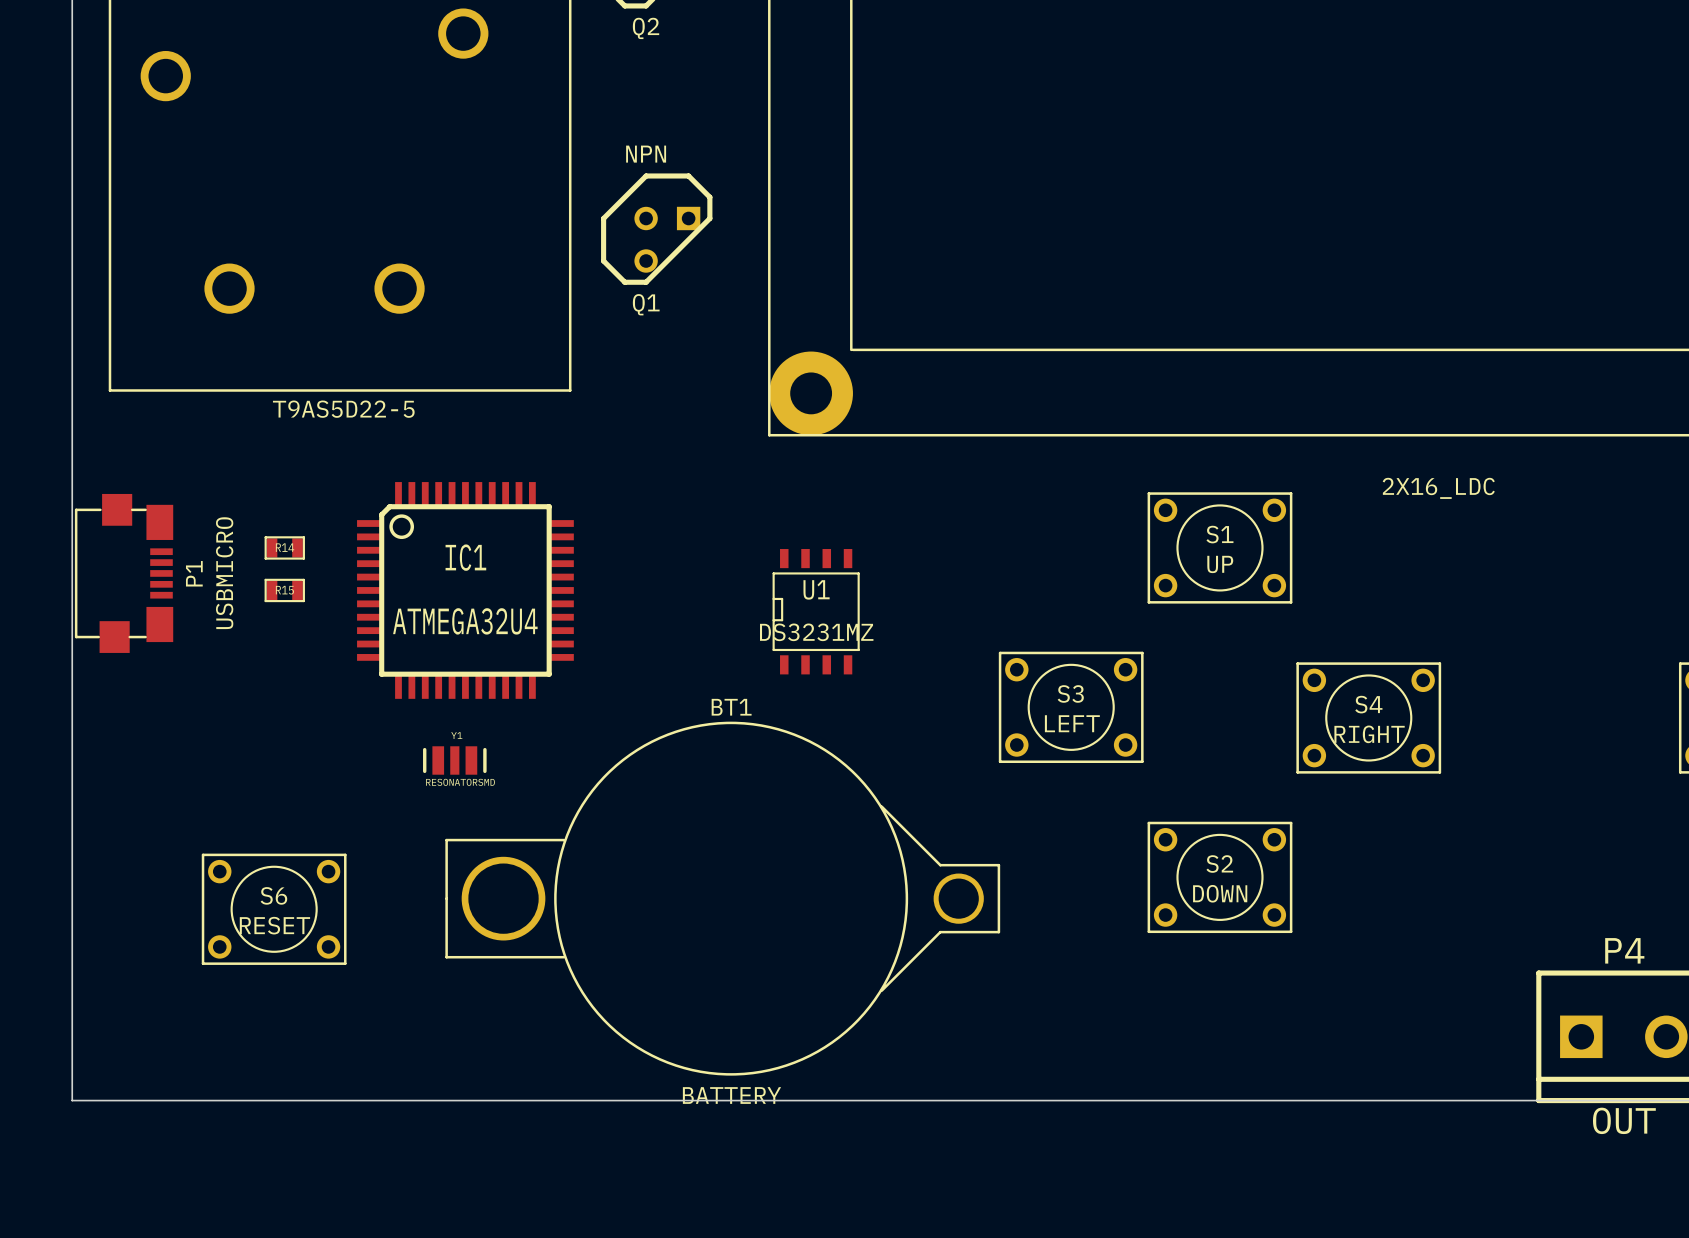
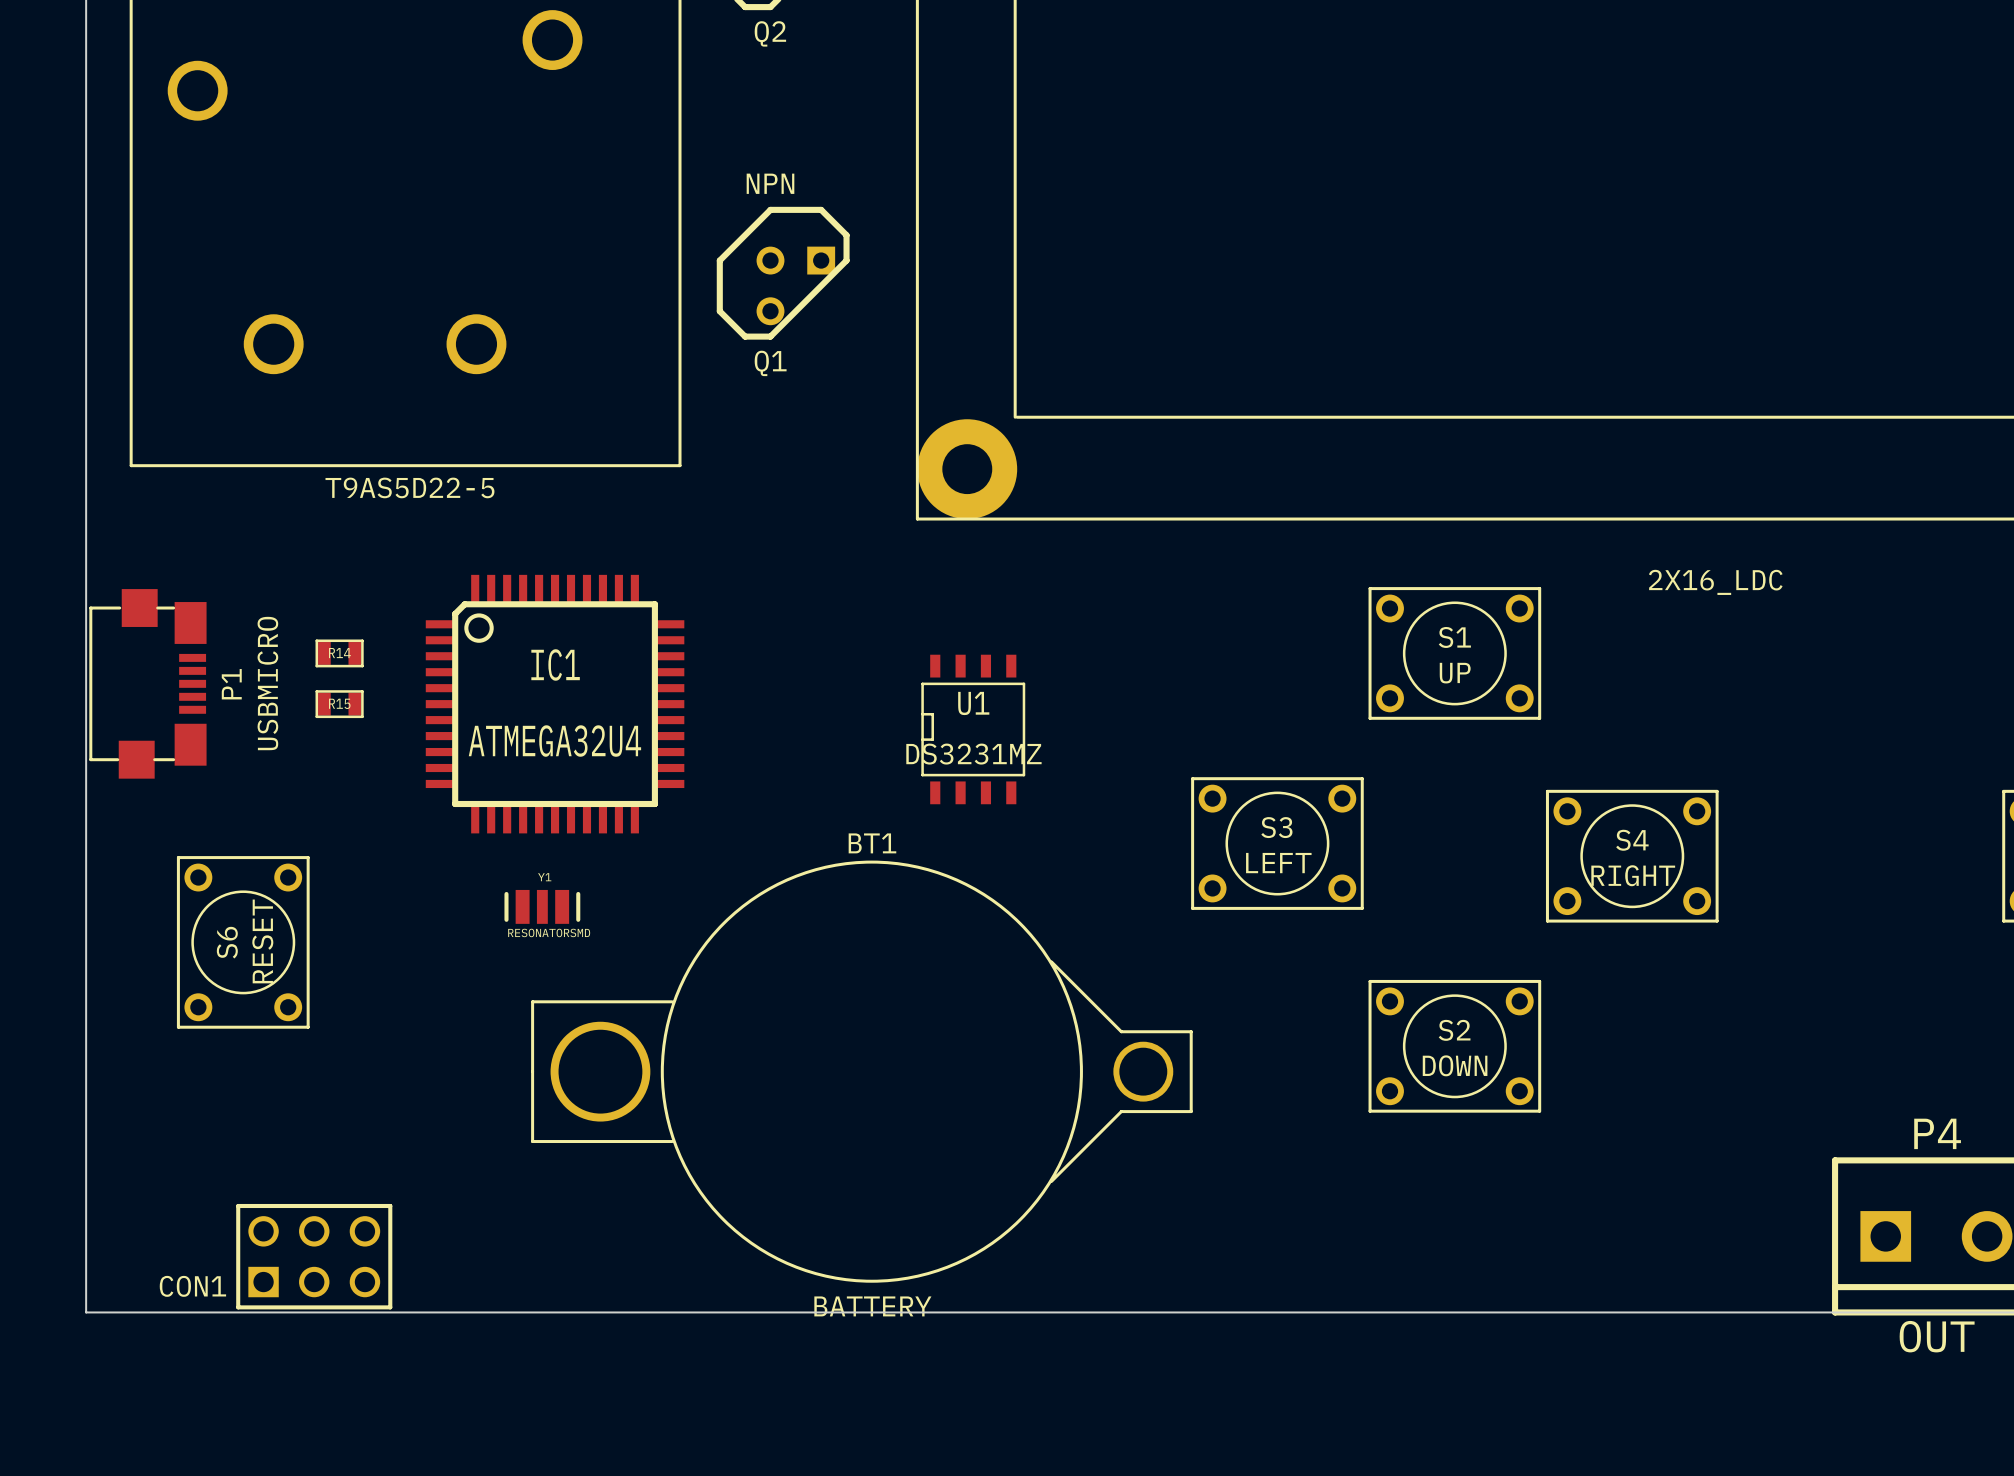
S6 rotation: 0° (274, 909) -> 90° clockwise (243, 942)
S6 position: (274, 909) -> (243, 942)
CON1: none -> (314, 1256)

